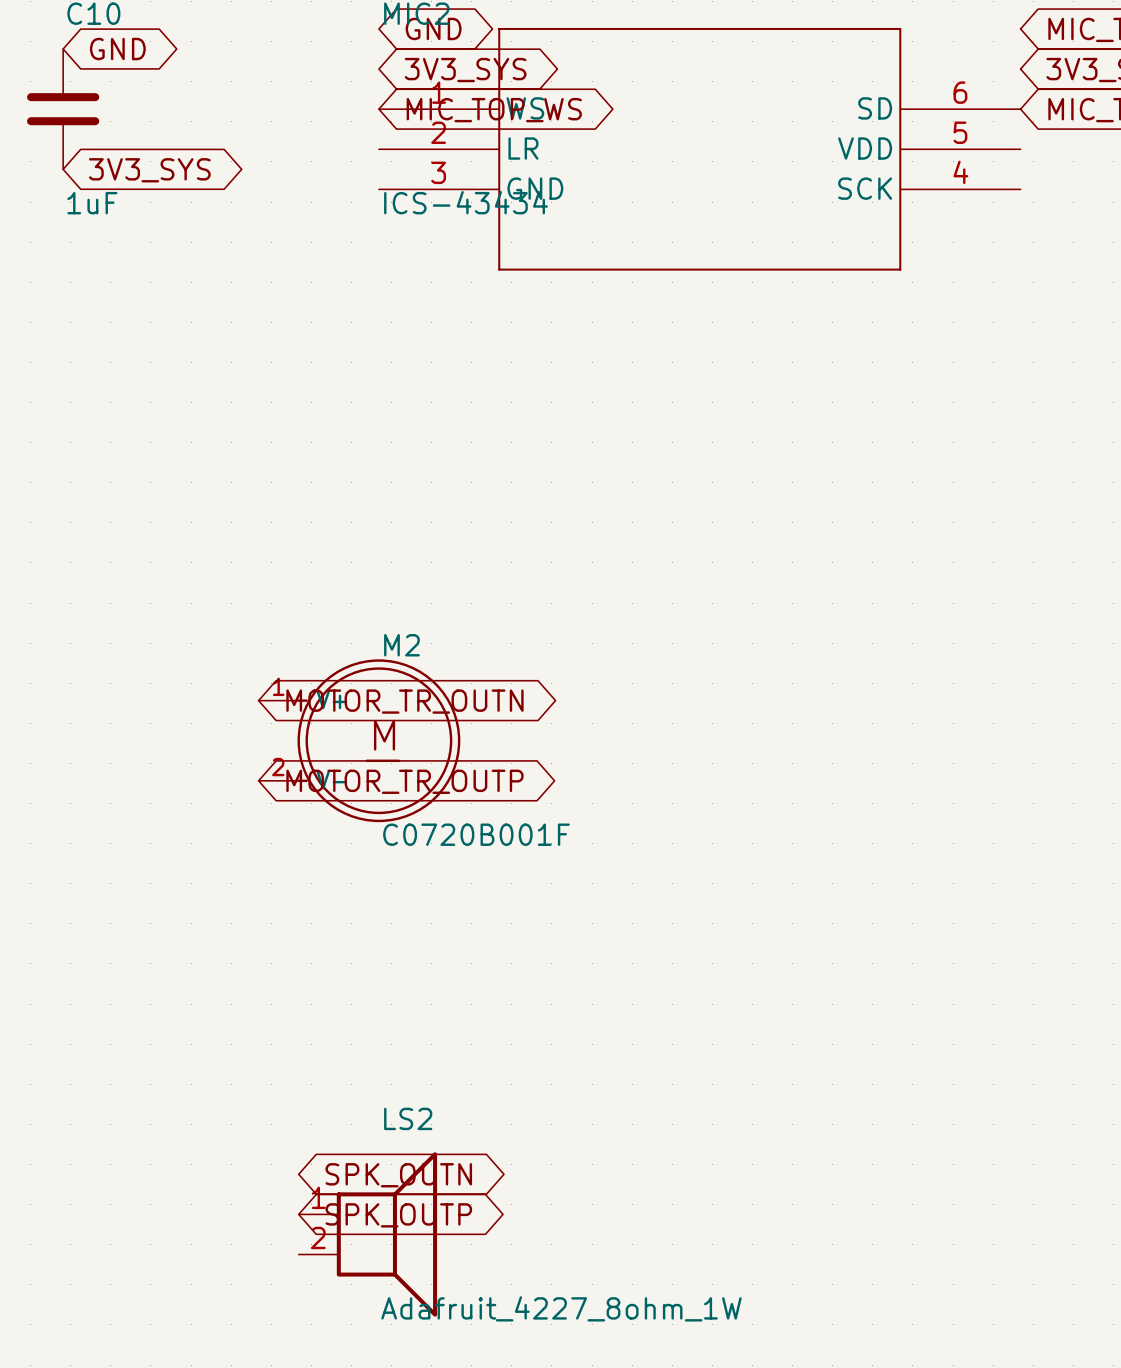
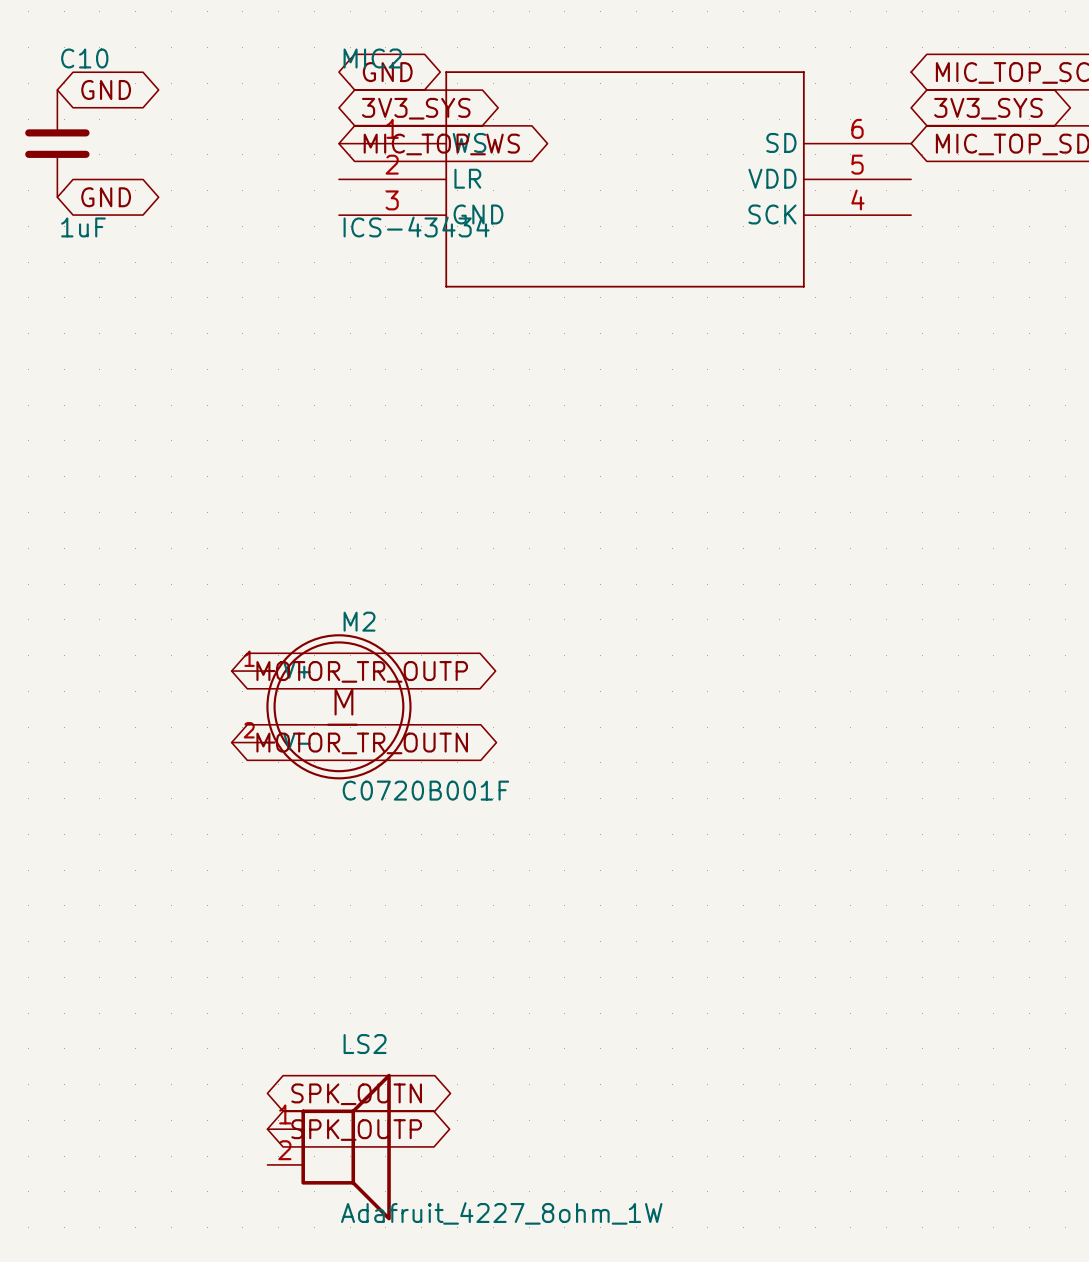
global label: 3V3_SYS (149, 170) -> GND (106, 197)
global label: MOTOR_TR_OUTN (404, 701) -> MOTOR_TR_OUTP (362, 671)
global label: MOTOR_TR_OUTP (404, 781) -> MOTOR_TR_OUTN (362, 743)

